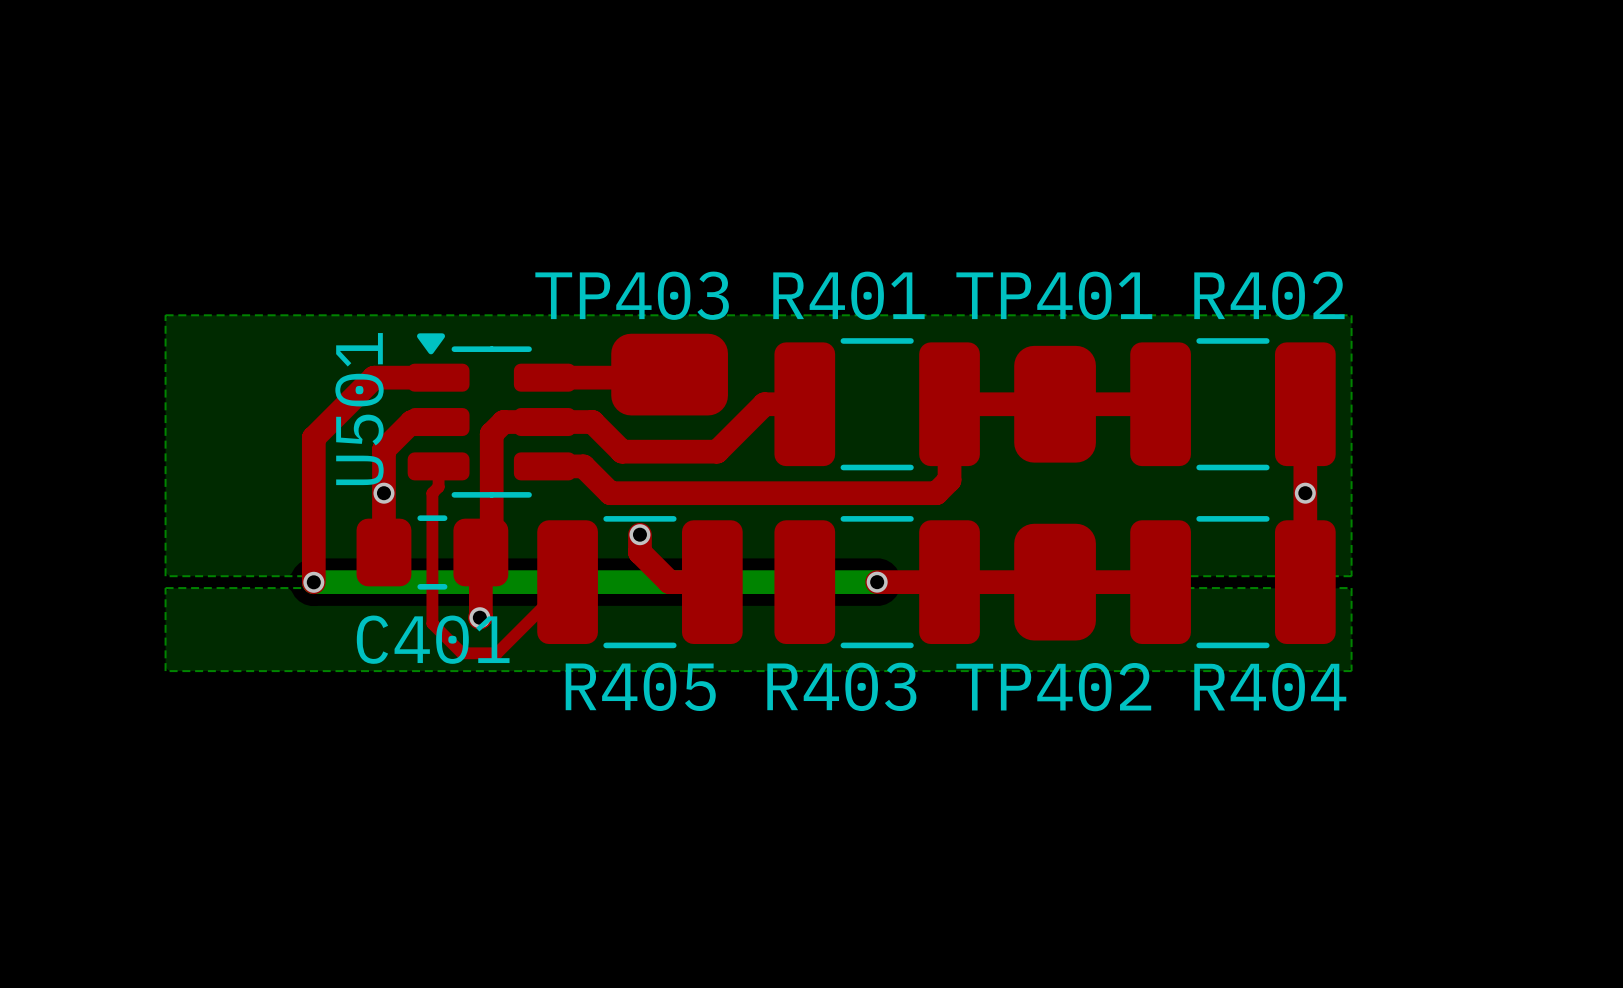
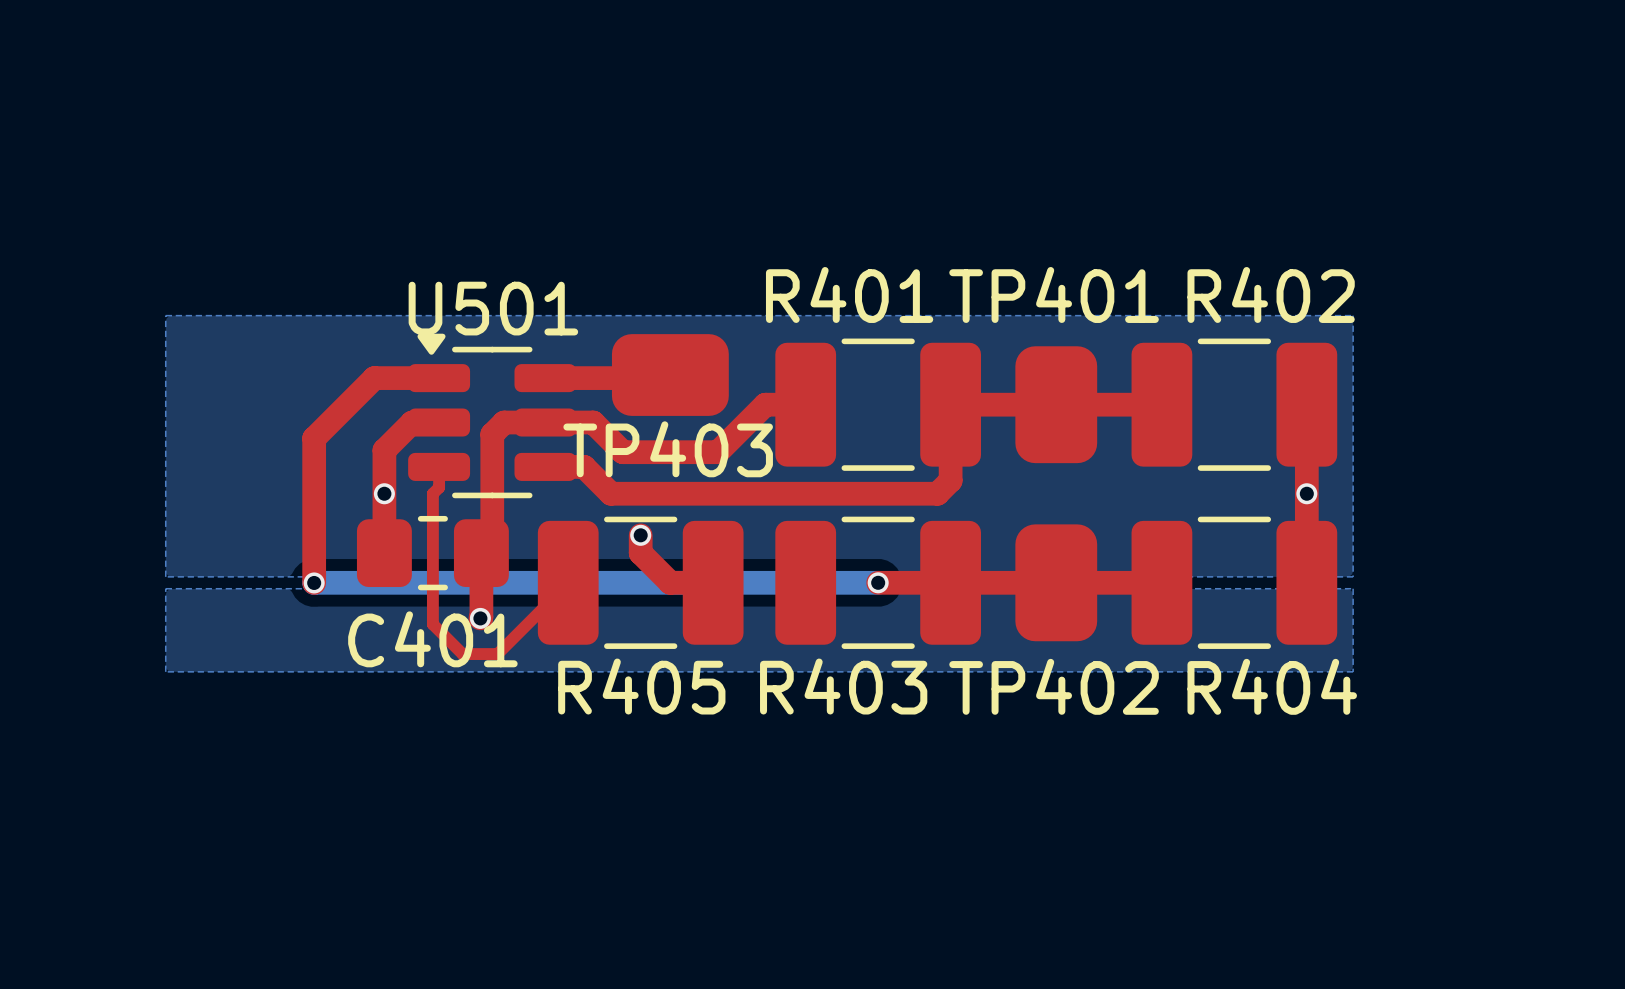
TP403 name position: TP403 (632, 295) -> TP403 (668, 449)
U501 name rotation: 0° (359, 409) -> 90° clockwise (493, 308)

